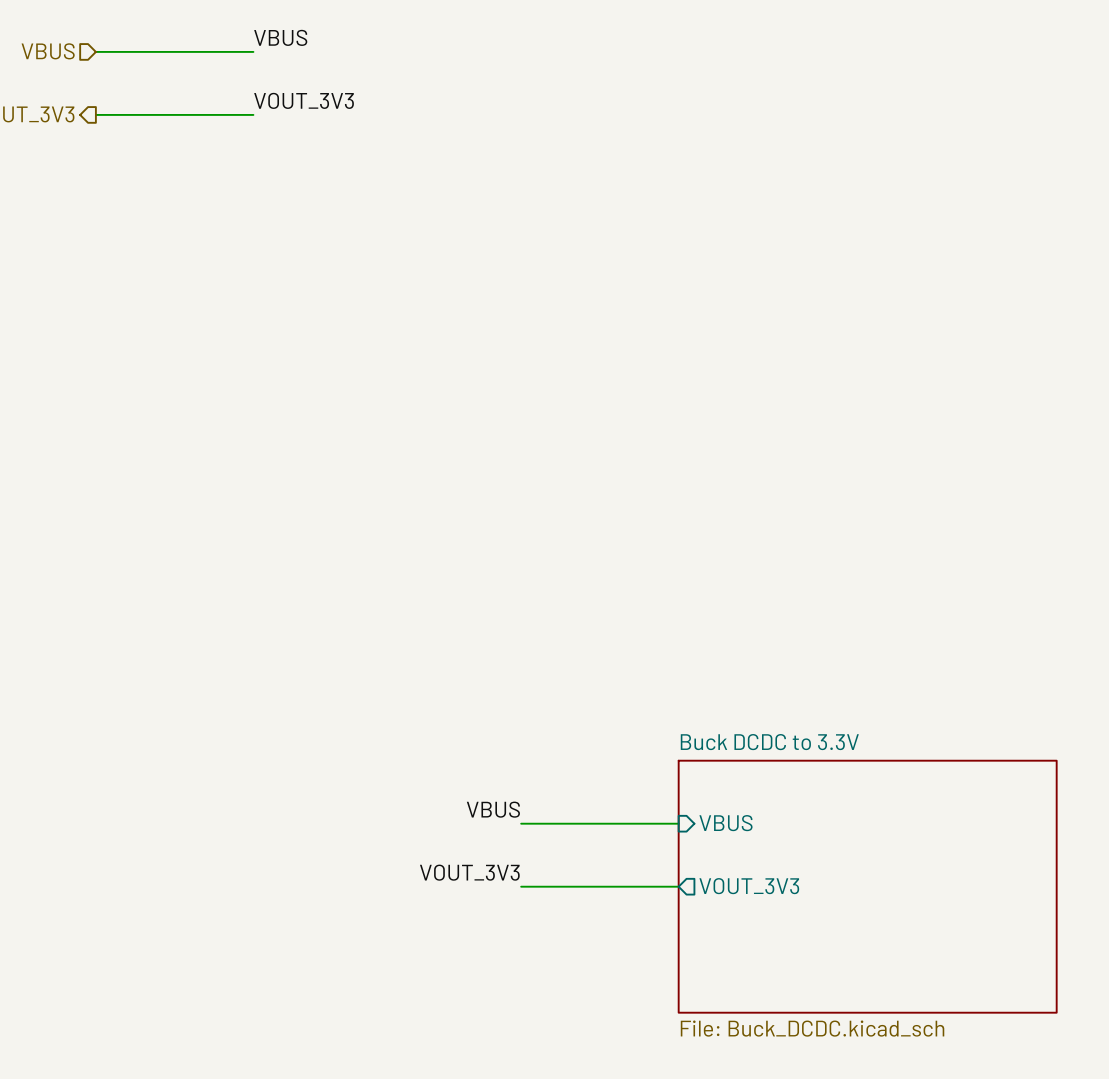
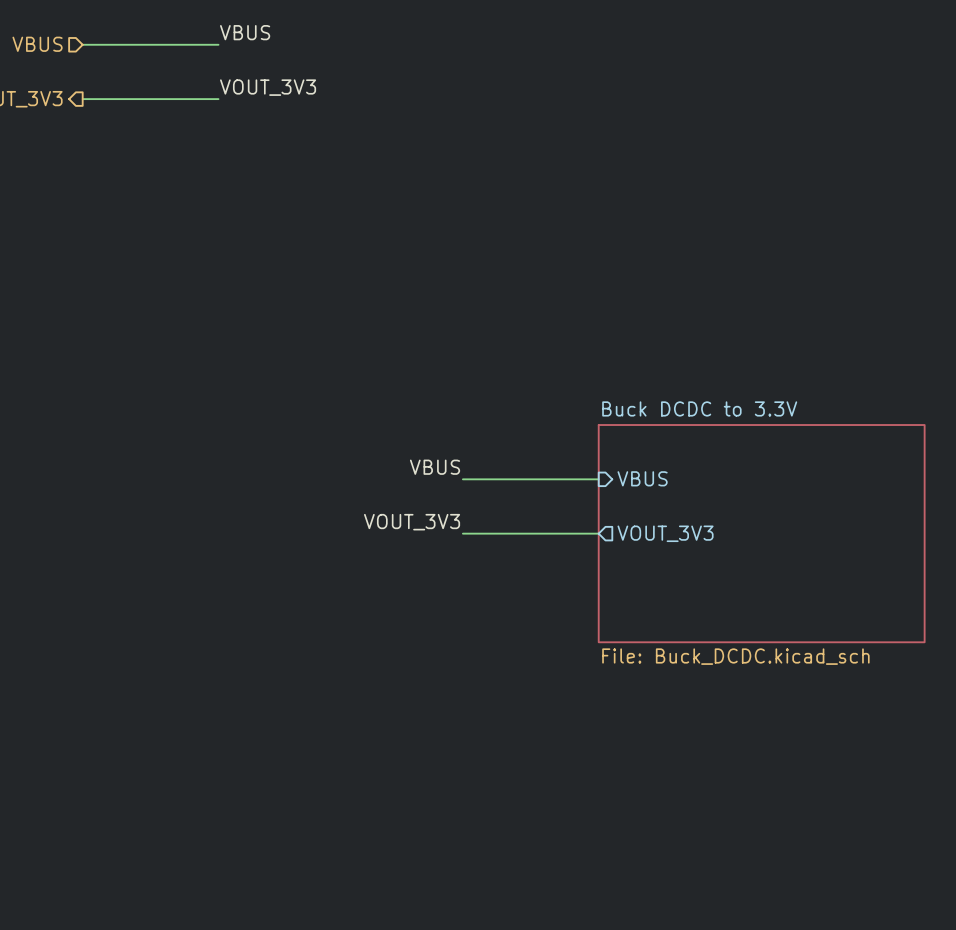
label position: VBUS (493, 809) -> VBUS (435, 467)
wire: (521, 823) (678, 823) -> (462, 479) (598, 479)
sheet pin position: VBUS (726, 823) -> VBUS (642, 478)
label position: VOUT_3V3 (469, 872) -> VOUT_3V3 (412, 522)
wire: (521, 886) (678, 886) -> (462, 533) (598, 533)
sheet pin position: VOUT_3V3 (749, 886) -> VOUT_3V3 (665, 533)
sheet Buck DCDC to 3.3V position: (867, 886) -> (761, 533)

